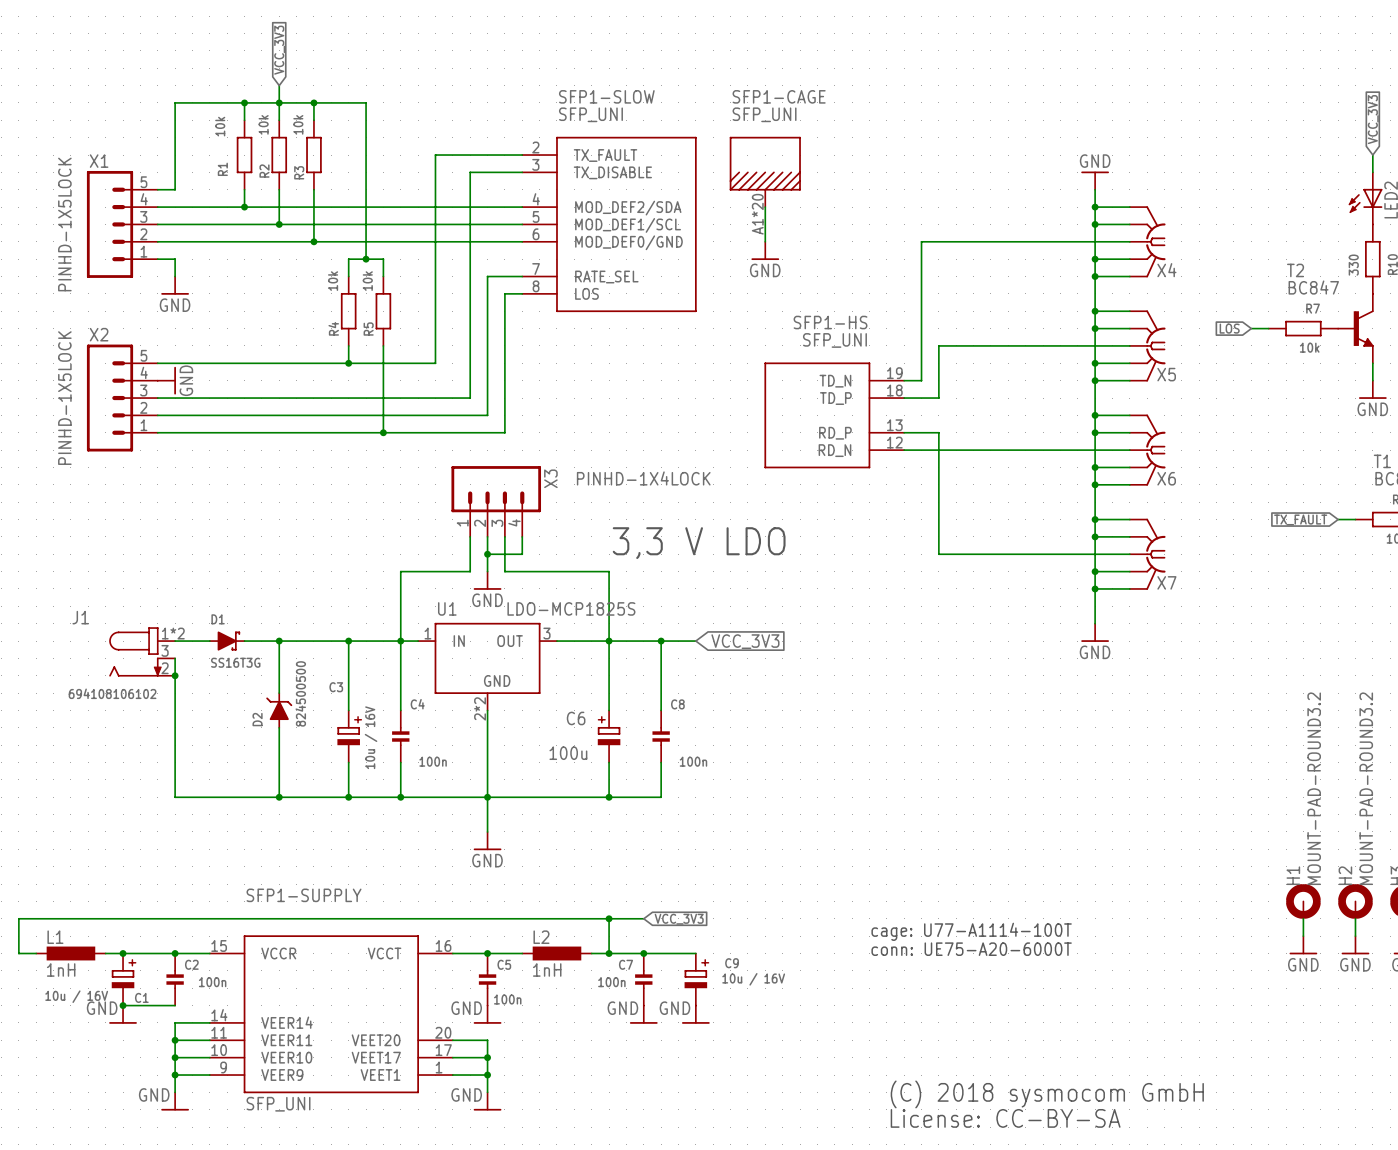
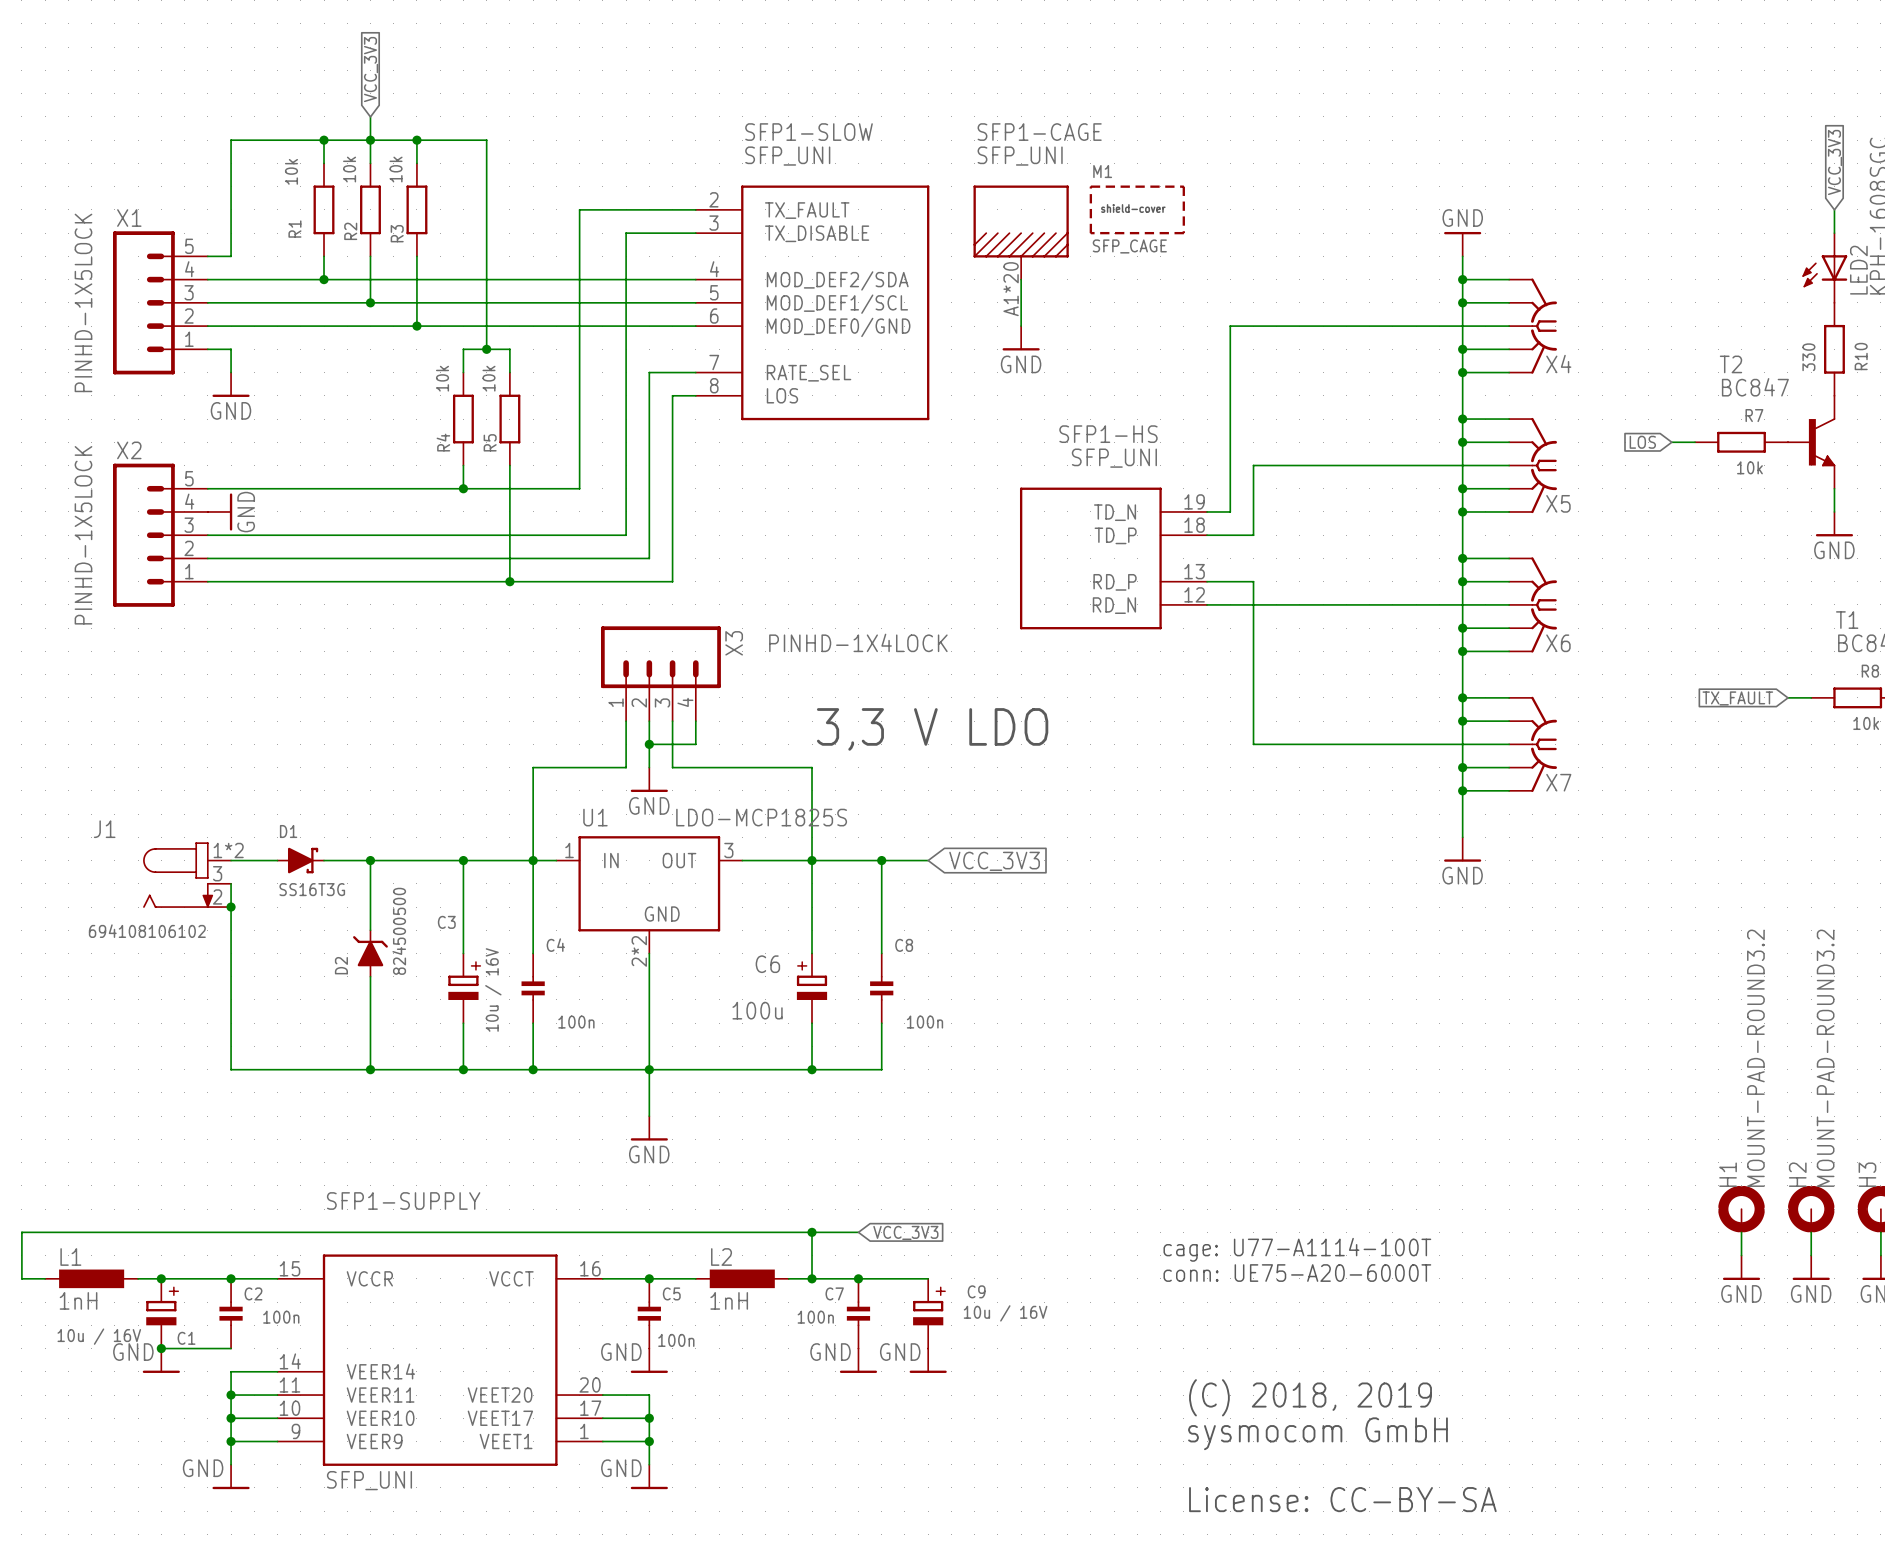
M1: none -> SFP_CAGE (1137, 209)
text: none -> (C) 2018, 2019 (1310, 1397)
text: (C) 2018 sysmocom GmbH (1047, 1094) -> sysmocom GmbH (1317, 1433)

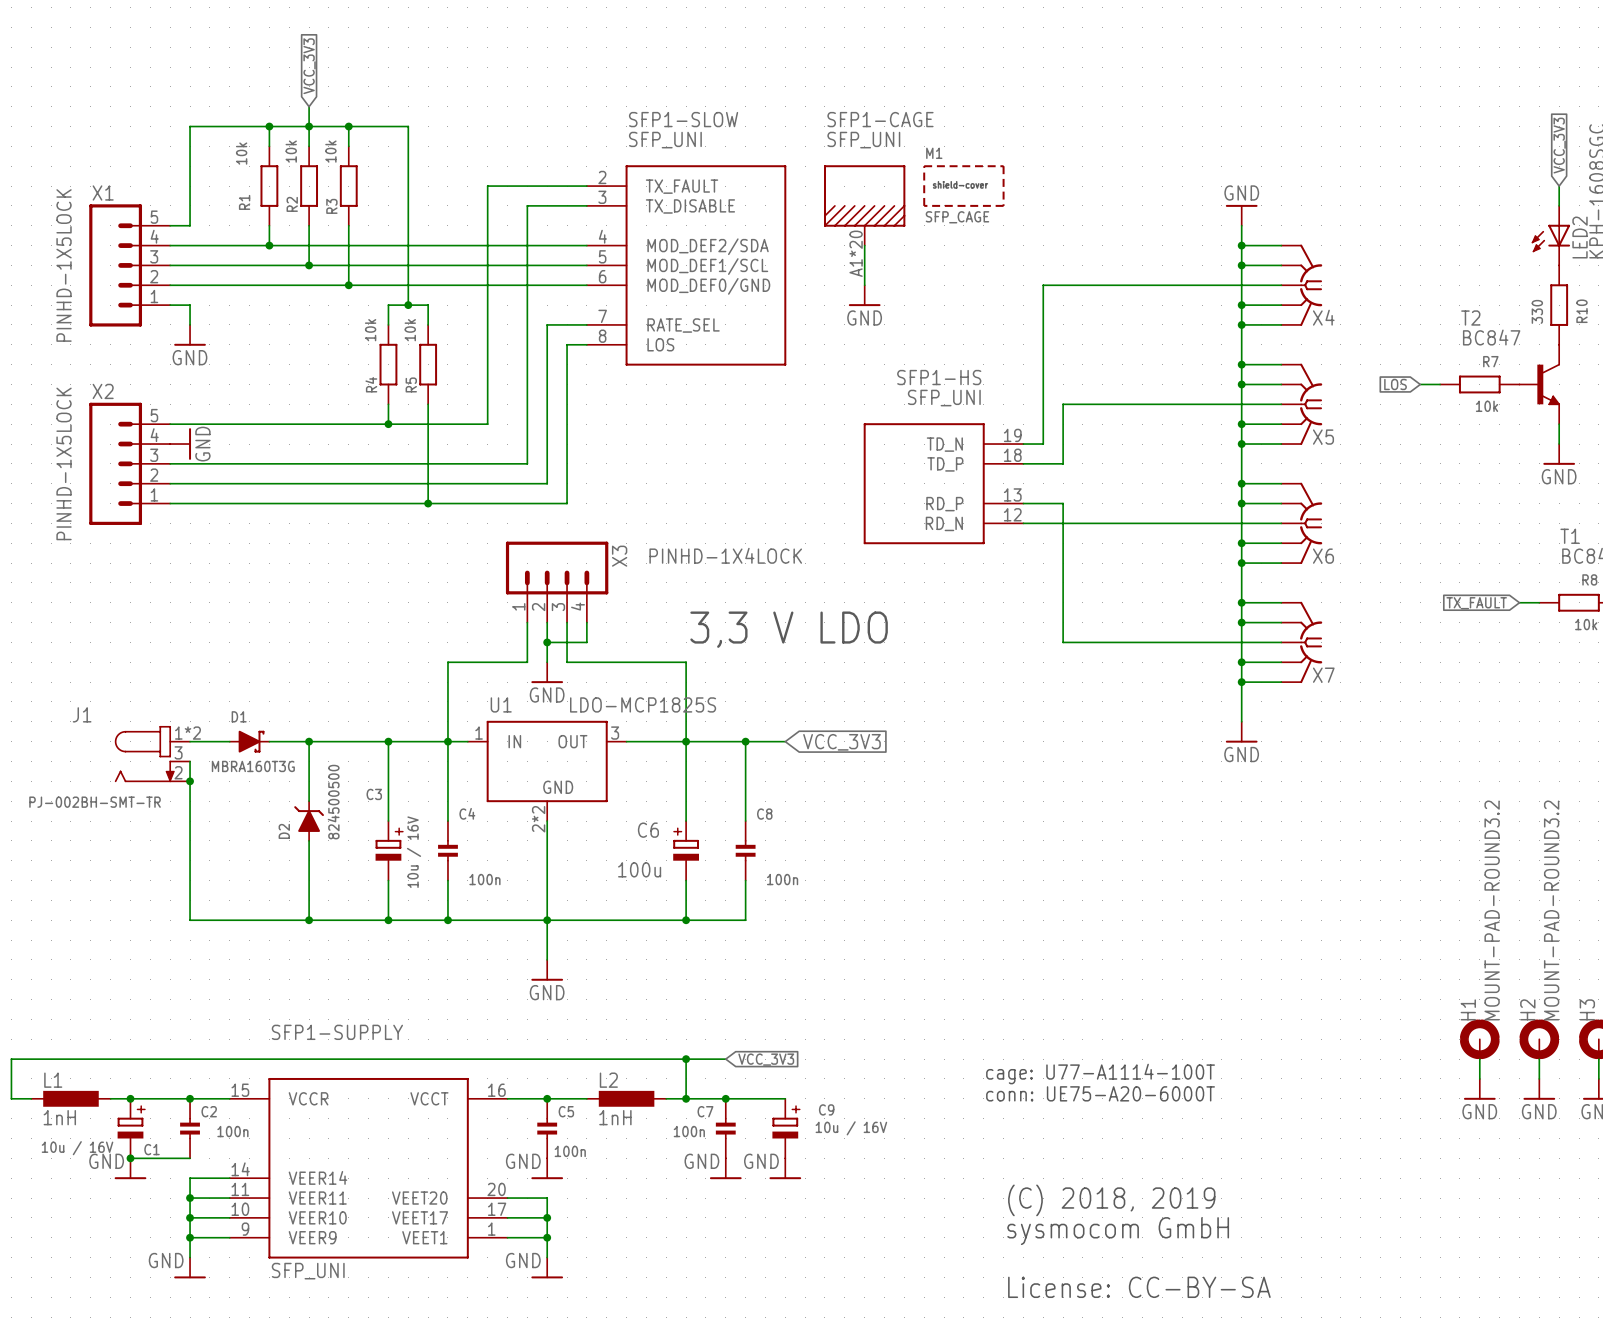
D1 value: SS16T3G (312, 889) -> MBRA160T3G (253, 766)
J1 value: 694108106102 (147, 931) -> PJ-002BH-SMT-TR (95, 802)

